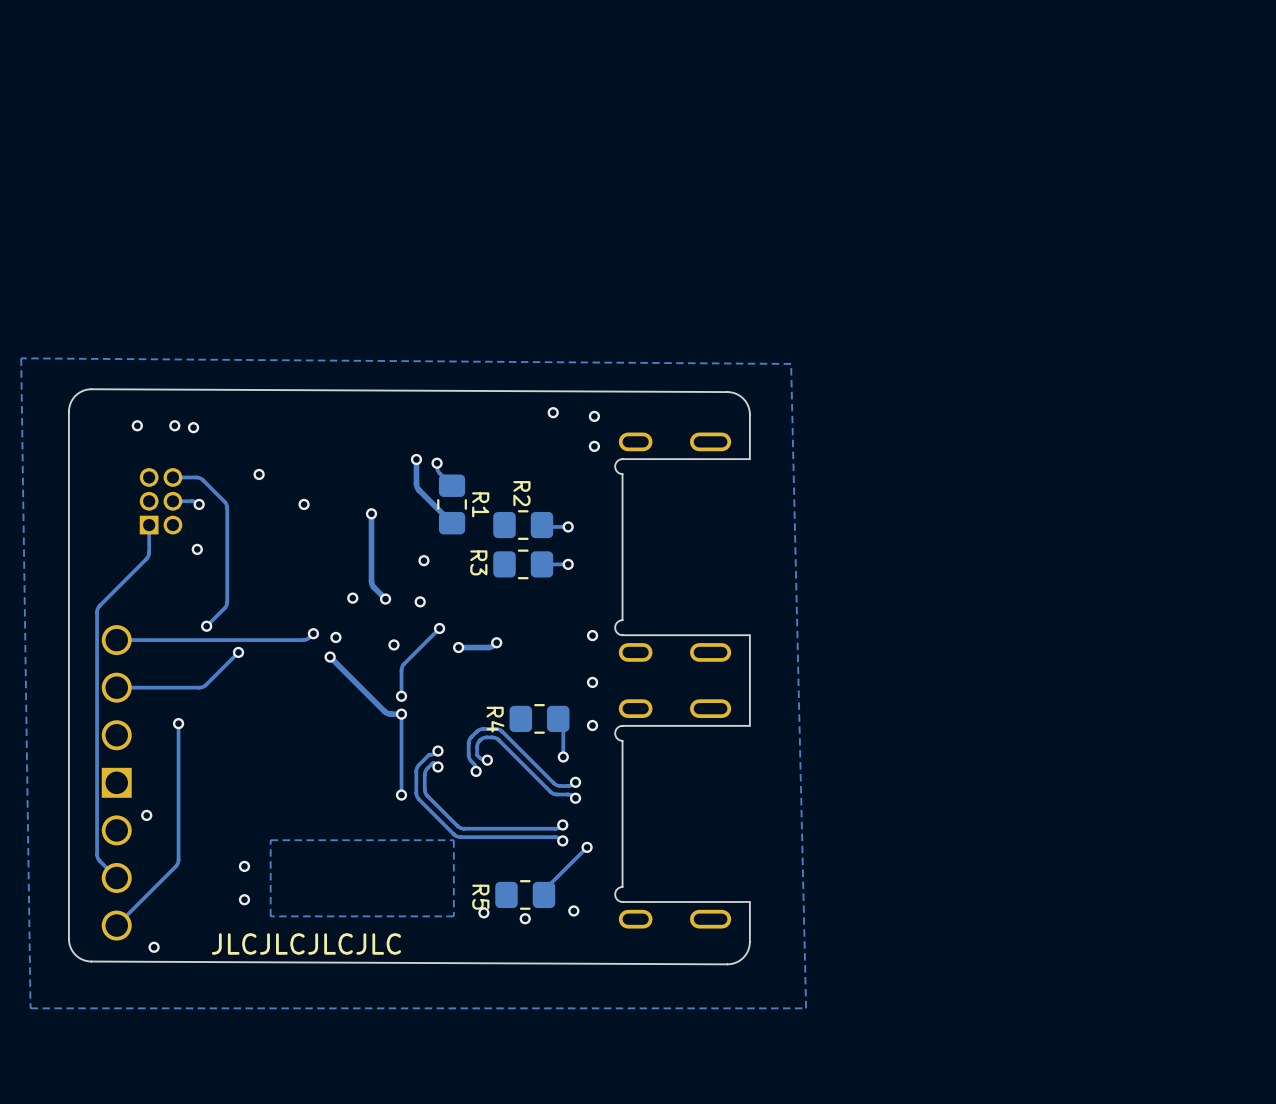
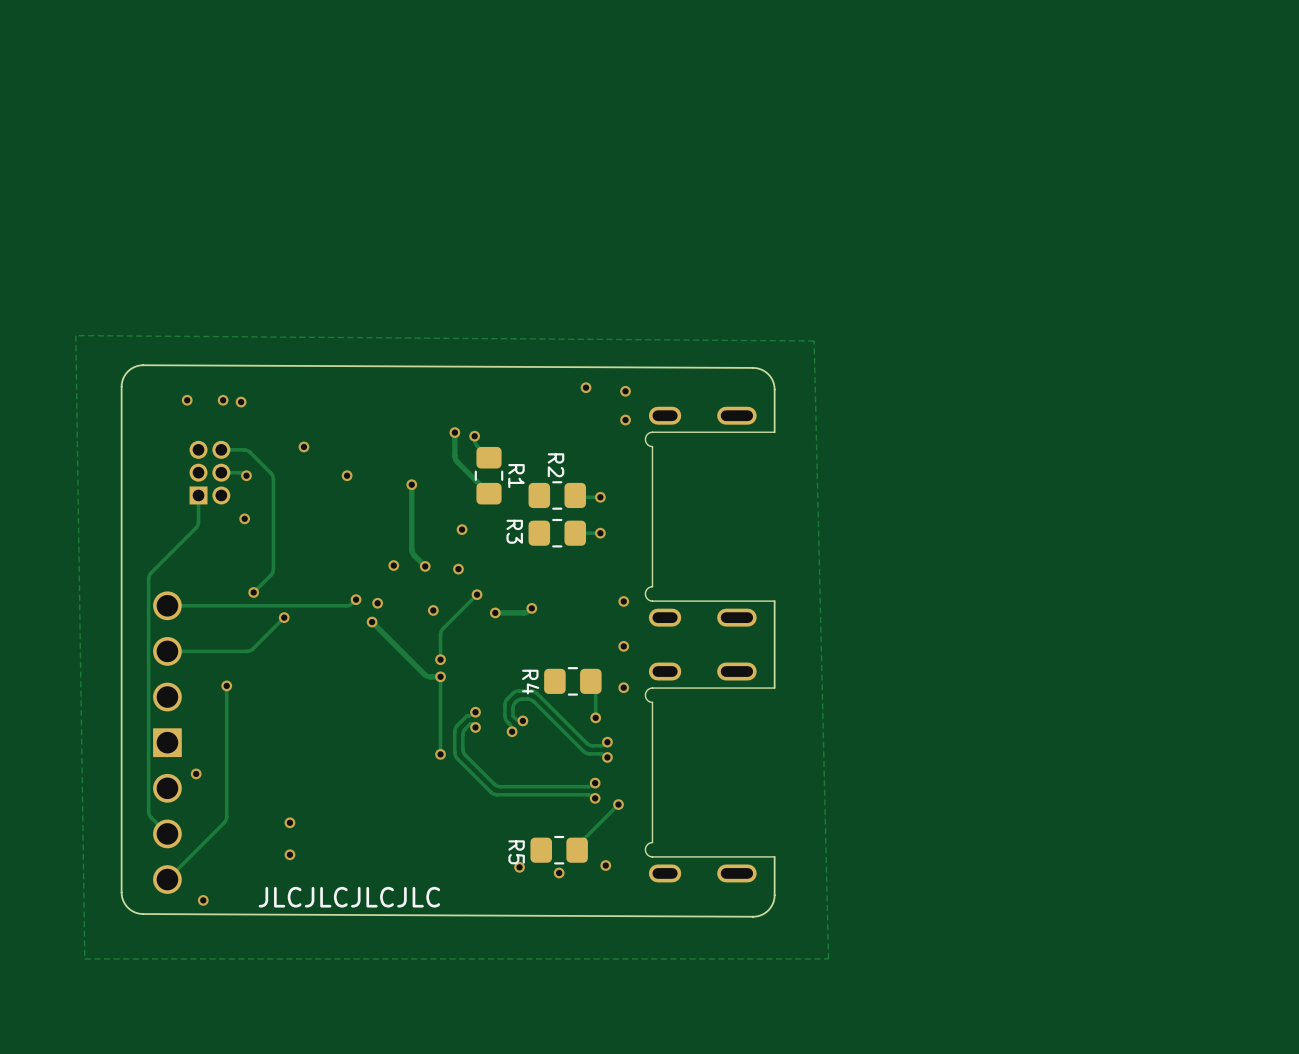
zone outline: (453, 840) (453, 916) (270, 916) (270, 840) (453, 840) -> none

